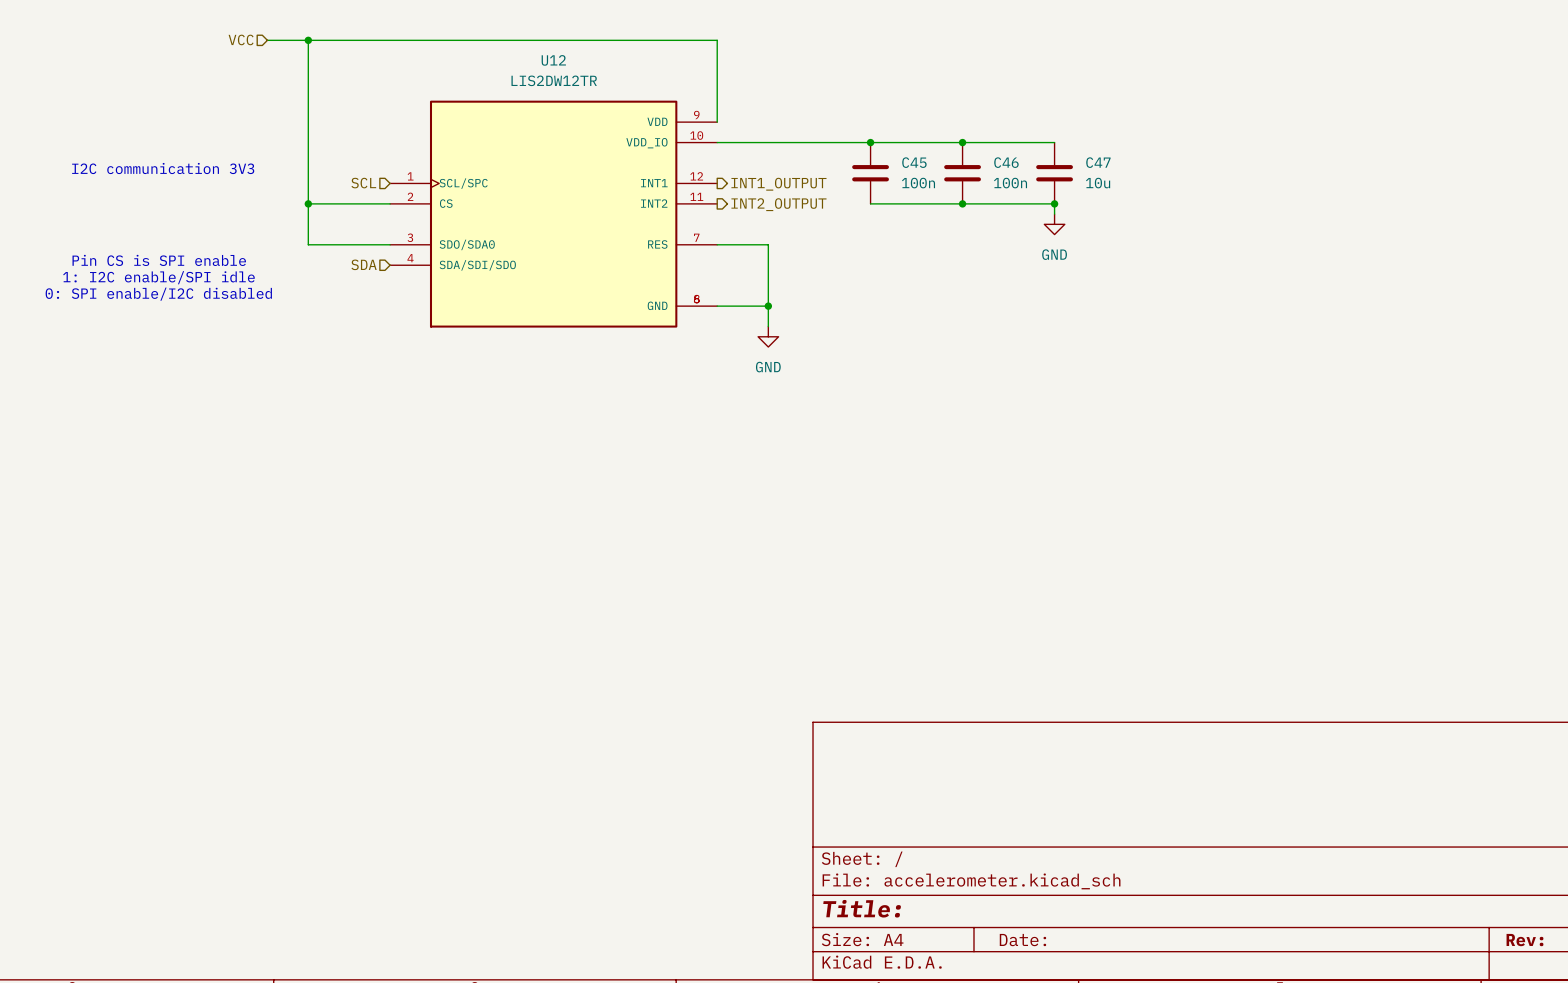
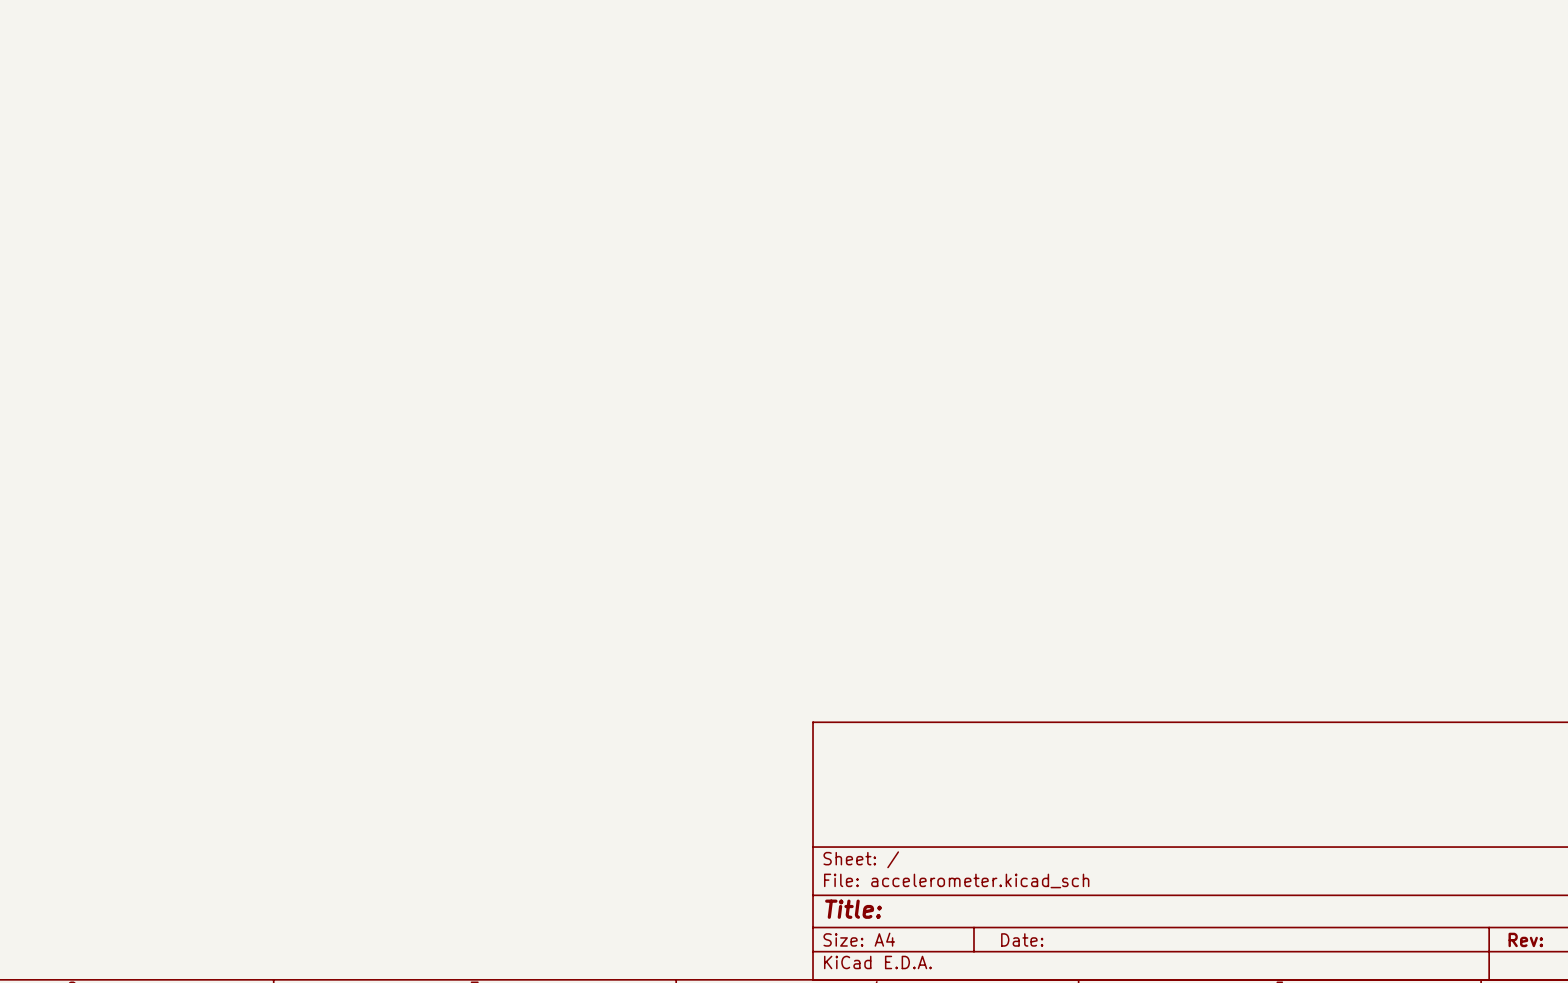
hierarchical label: VCC (241, 39) -> none
wire: (267, 40) (717, 40) (717, 122) -> none
wire: (308, 40) (308, 244) (390, 244) -> none
junction: (308, 40) -> none
wire: (717, 142) (1054, 142) -> none
junction: (870, 142) -> none
junction: (962, 142) -> none
text: I2C communication 3V3 (163, 168) -> none
C45: 100n (870, 173) -> none
C46: 100n (962, 173) -> none
C47: 10u (1054, 173) -> none
hierarchical label: SCL (363, 183) -> none
hierarchical label: INT1_OUTPUT (778, 184) -> none
wire: (308, 203) (390, 203) -> none
junction: (308, 203) -> none
wire: (870, 203) (1054, 203) (1054, 214) -> none
junction: (962, 203) -> none
junction: (1054, 203) -> none
hierarchical label: INT2_OUTPUT (778, 204) -> none
U12: LIS2DW12TR (553, 214) -> none
power symbol: GND (1054, 224) -> none
wire: (717, 244) (768, 244) (768, 326) -> none
text: Pin CS is SPI enable (159, 260) -> none
hierarchical label: SDA (364, 264) -> none
text: 1: I2C enable/SPI idle (158, 277) -> none
text: 0: SPI enable/I2C disabled (158, 294) -> none
wire: (717, 306) (768, 306) -> none
junction: (768, 306) -> none
power symbol: GND (768, 336) -> none

